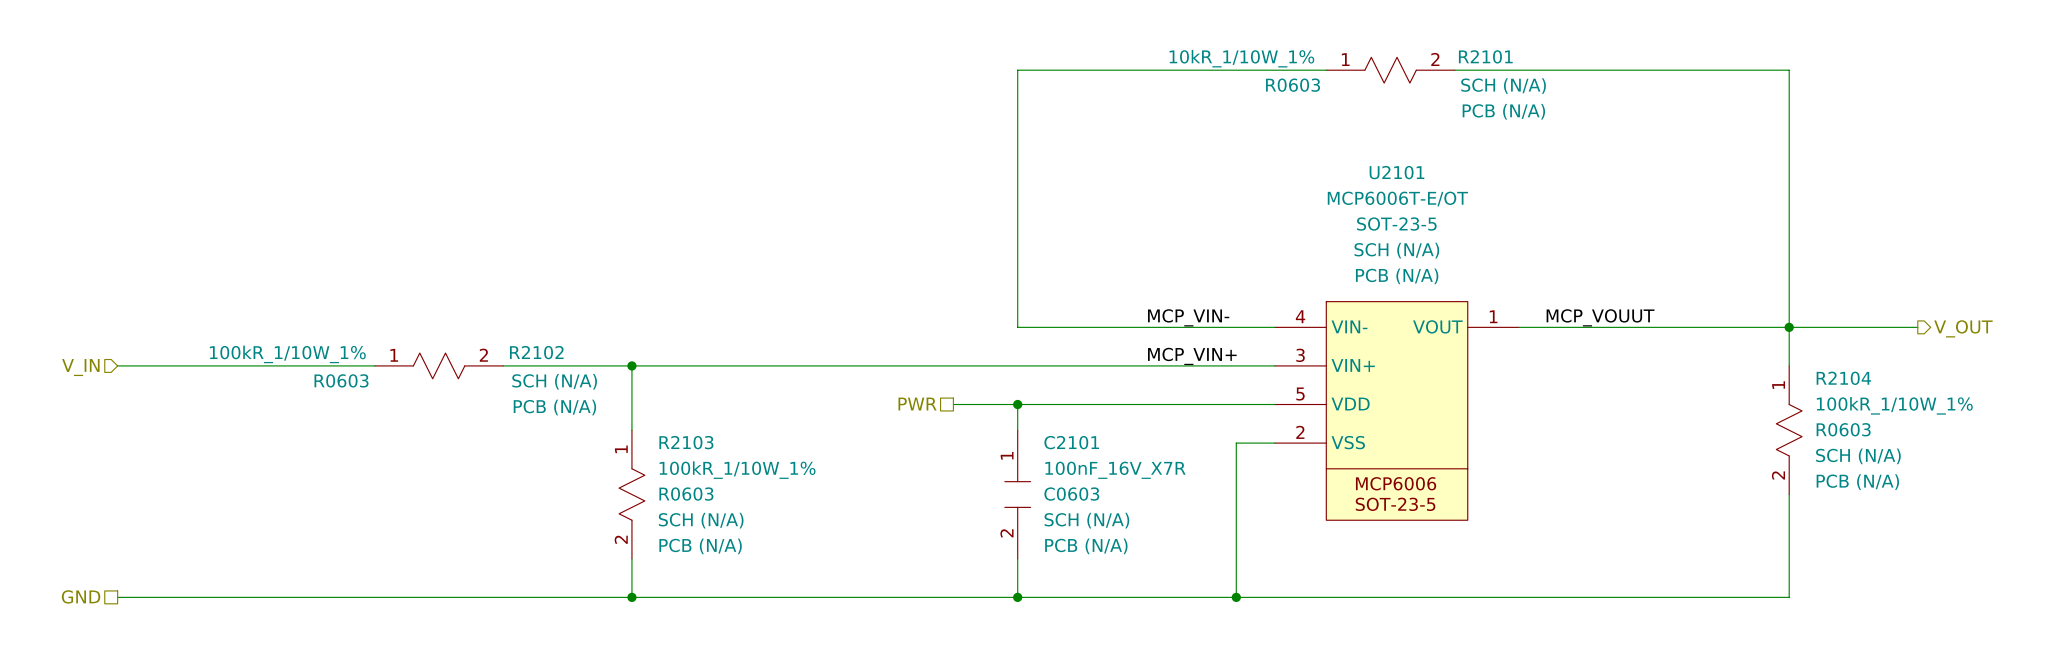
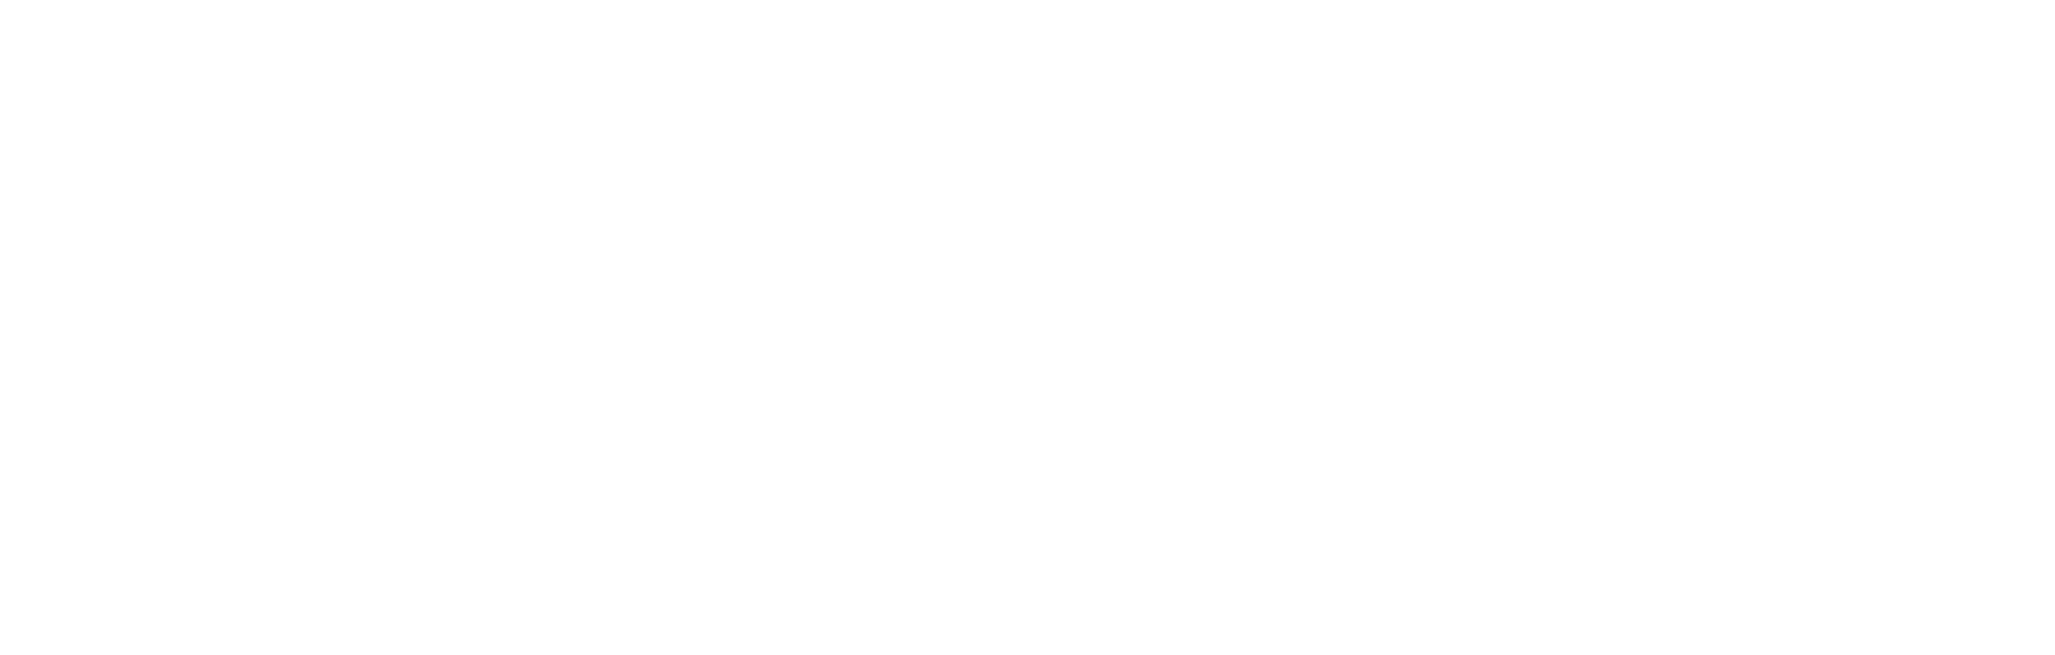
wire: (1326, 70) (1017, 70) (1017, 327) (1274, 327) -> none
R2101: 10kR_1/10W_1% (1390, 70) -> none
wire: (1454, 70) (1789, 70) (1789, 365) -> none
label: MCP_VIN- (1188, 317) -> none
label: MCP_VOUUT (1600, 317) -> none
wire: (1519, 327) (1917, 327) -> none
junction: (1789, 327) -> none
hierarchical label: V_OUT (1963, 328) -> none
label: MCP_VIN+ (1192, 356) -> none
wire: (117, 365) (374, 365) -> none
R2102: 100kR_1/10W_1% (439, 365) -> none
wire: (503, 365) (1274, 365) -> none
wire: (631, 365) (631, 430) -> none
junction: (631, 365) -> none
hierarchical label: V_IN (80, 367) -> none
hierarchical label: PWR (917, 404) -> none
wire: (953, 404) (1274, 404) -> none
wire: (1017, 404) (1017, 430) -> none
junction: (1017, 404) -> none
U2101: MCP6006T-E/OT (1397, 410) -> none
R2104: 100kR_1/10W_1% (1789, 430) -> none
wire: (1274, 443) (1236, 443) (1236, 597) -> none
R2103: 100kR_1/10W_1% (631, 494) -> none
C2101: 100nF_16V_X7R (1017, 494) -> none
wire: (1789, 494) (1789, 597) (117, 597) -> none
wire: (631, 558) (631, 597) -> none
wire: (1017, 558) (1017, 597) -> none
hierarchical label: GND (81, 596) -> none
junction: (631, 597) -> none
junction: (1017, 597) -> none
junction: (1236, 597) -> none

